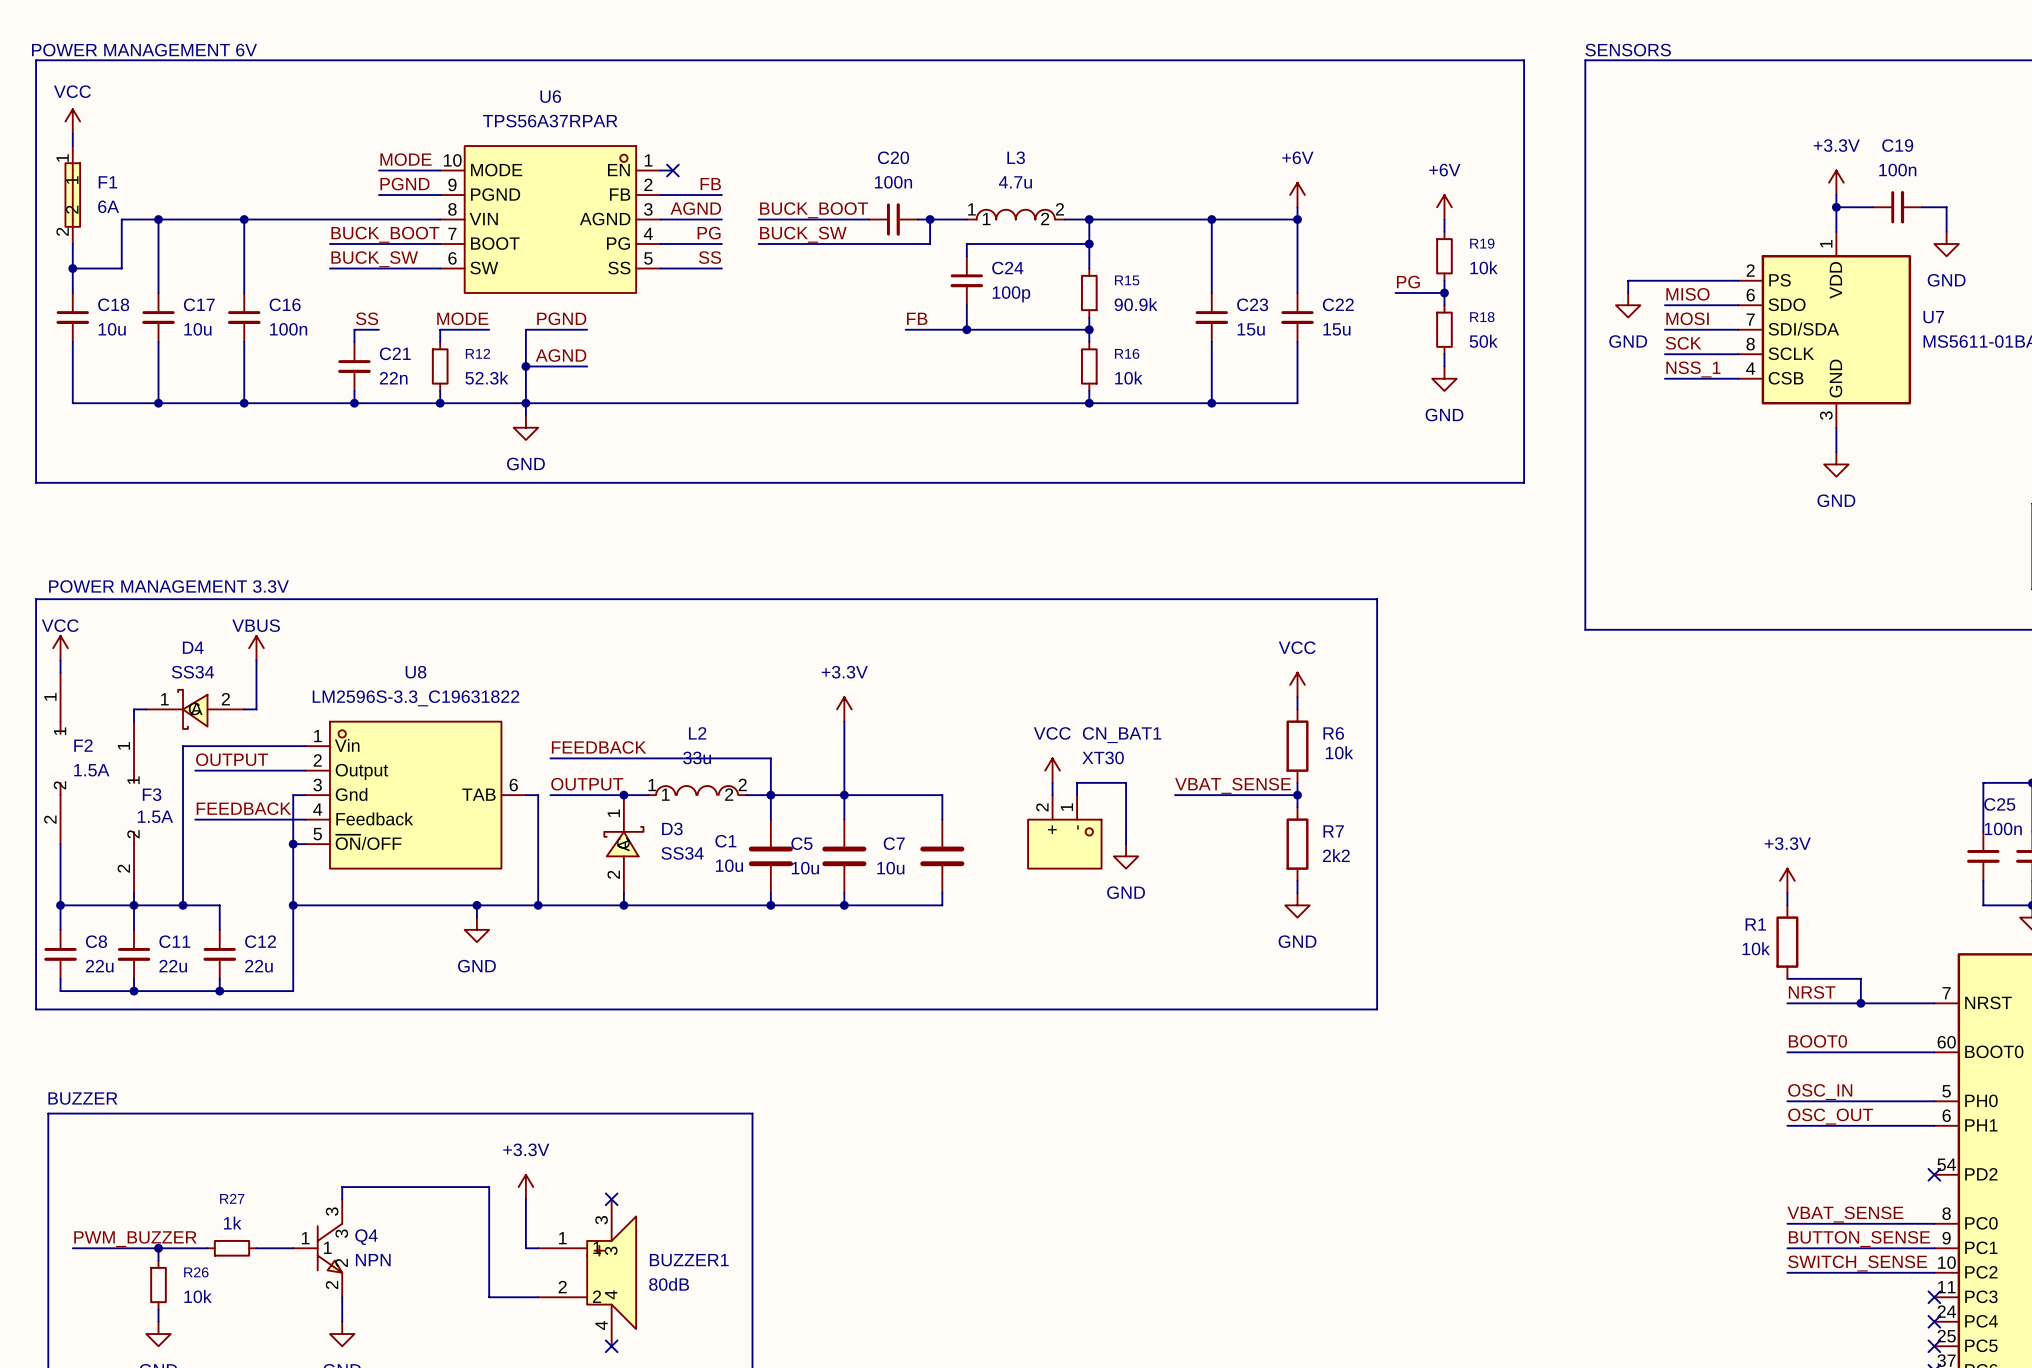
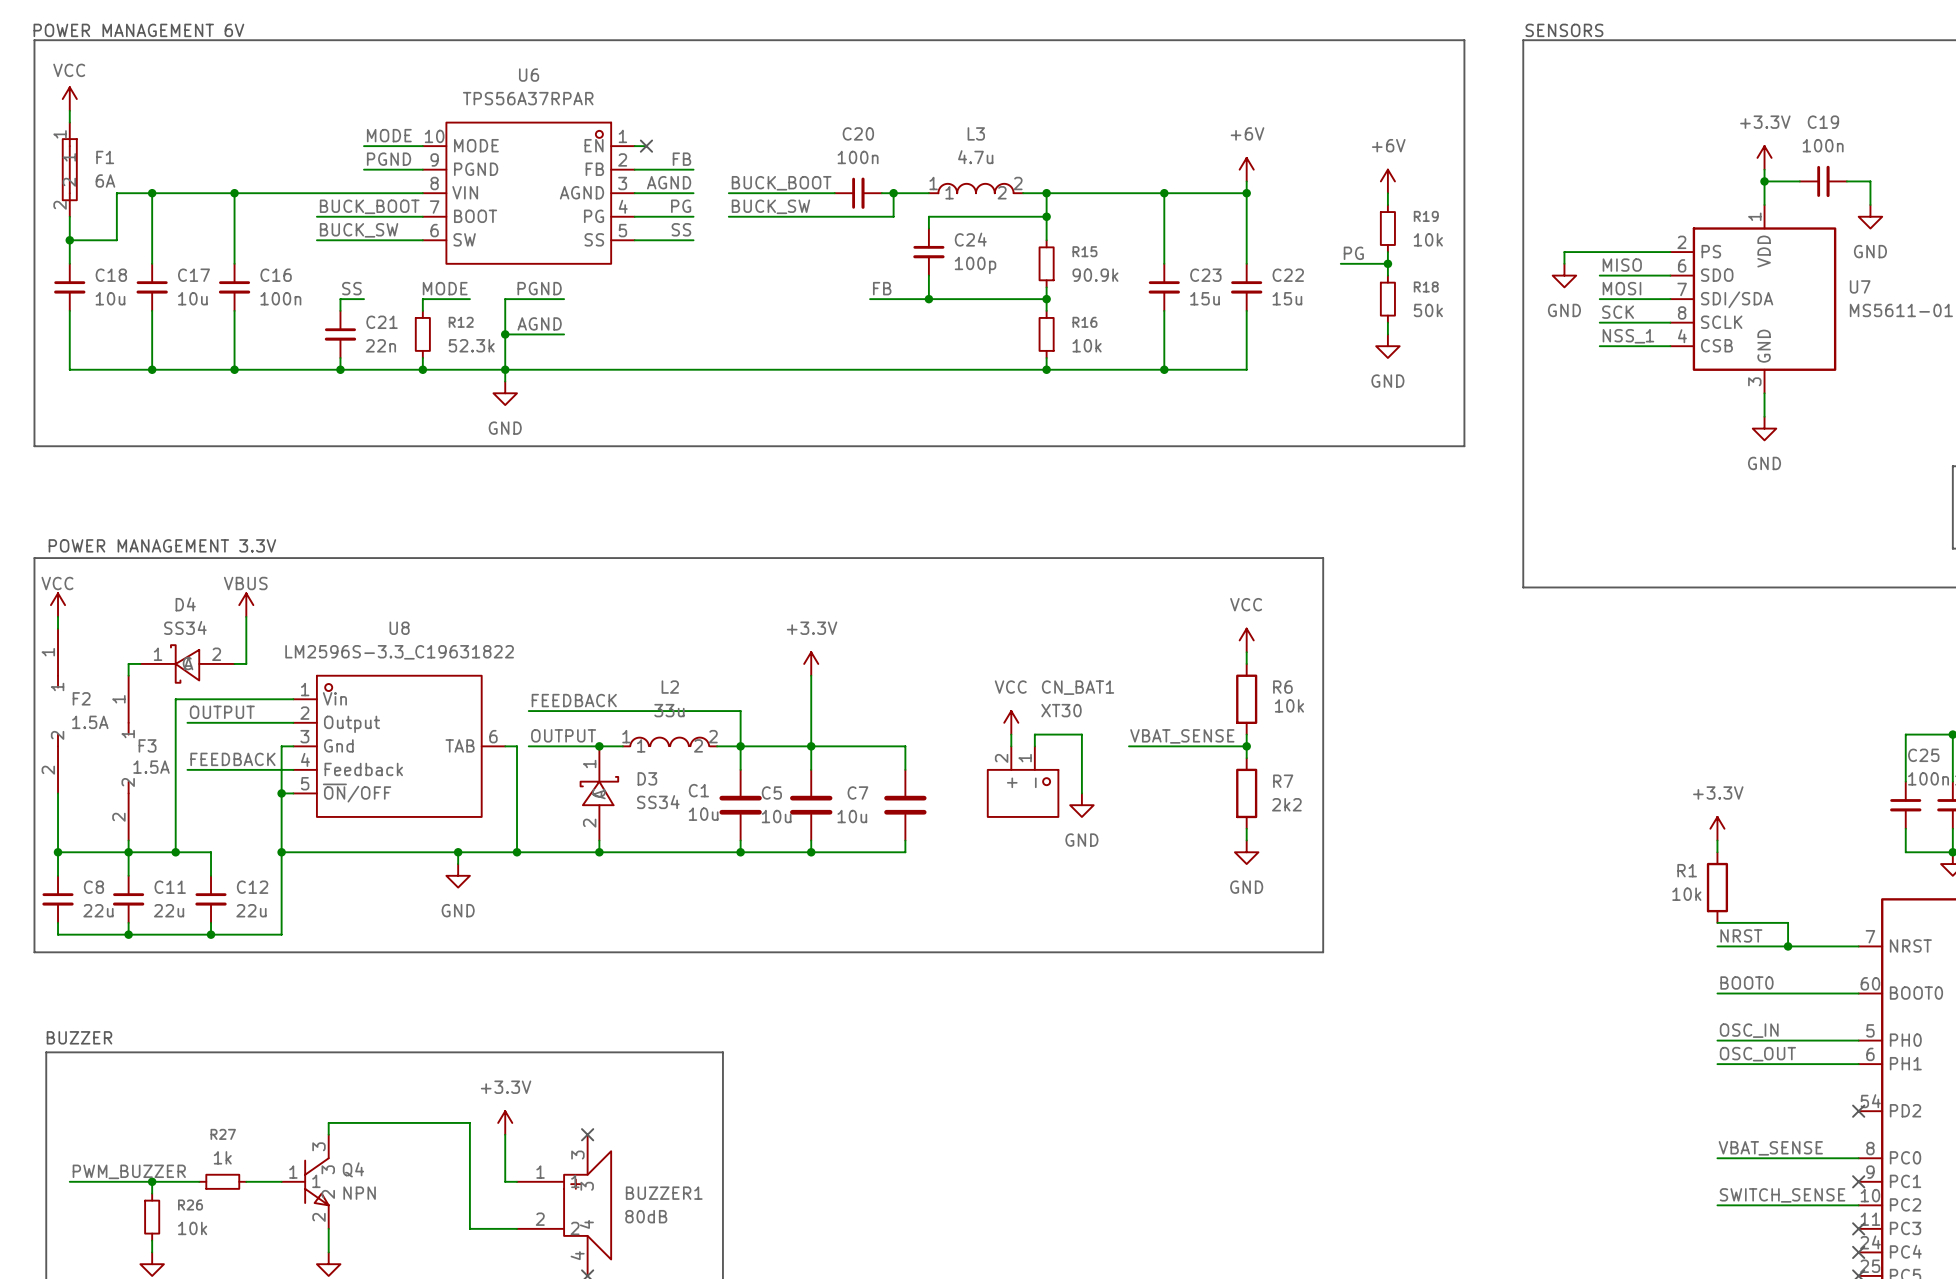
label: BUTTON_SENSE (1859, 1239) -> none
wire: (1787, 1248) (1934, 1248) -> none
no-connect mark: none -> (1858, 1181)

